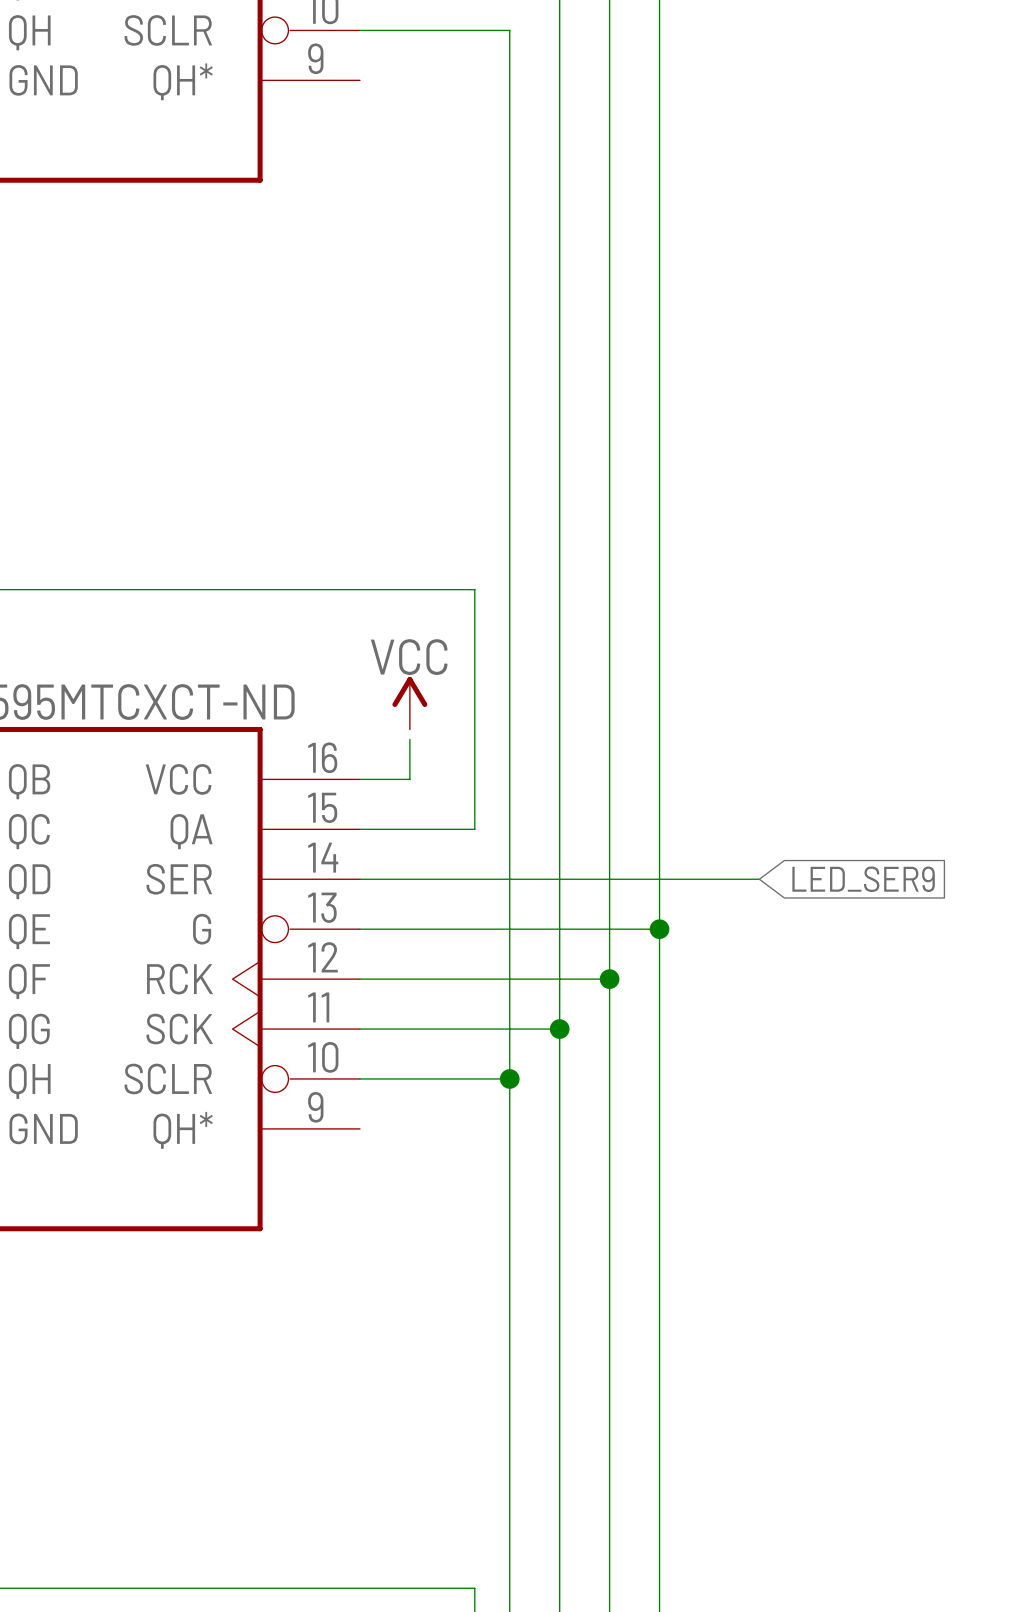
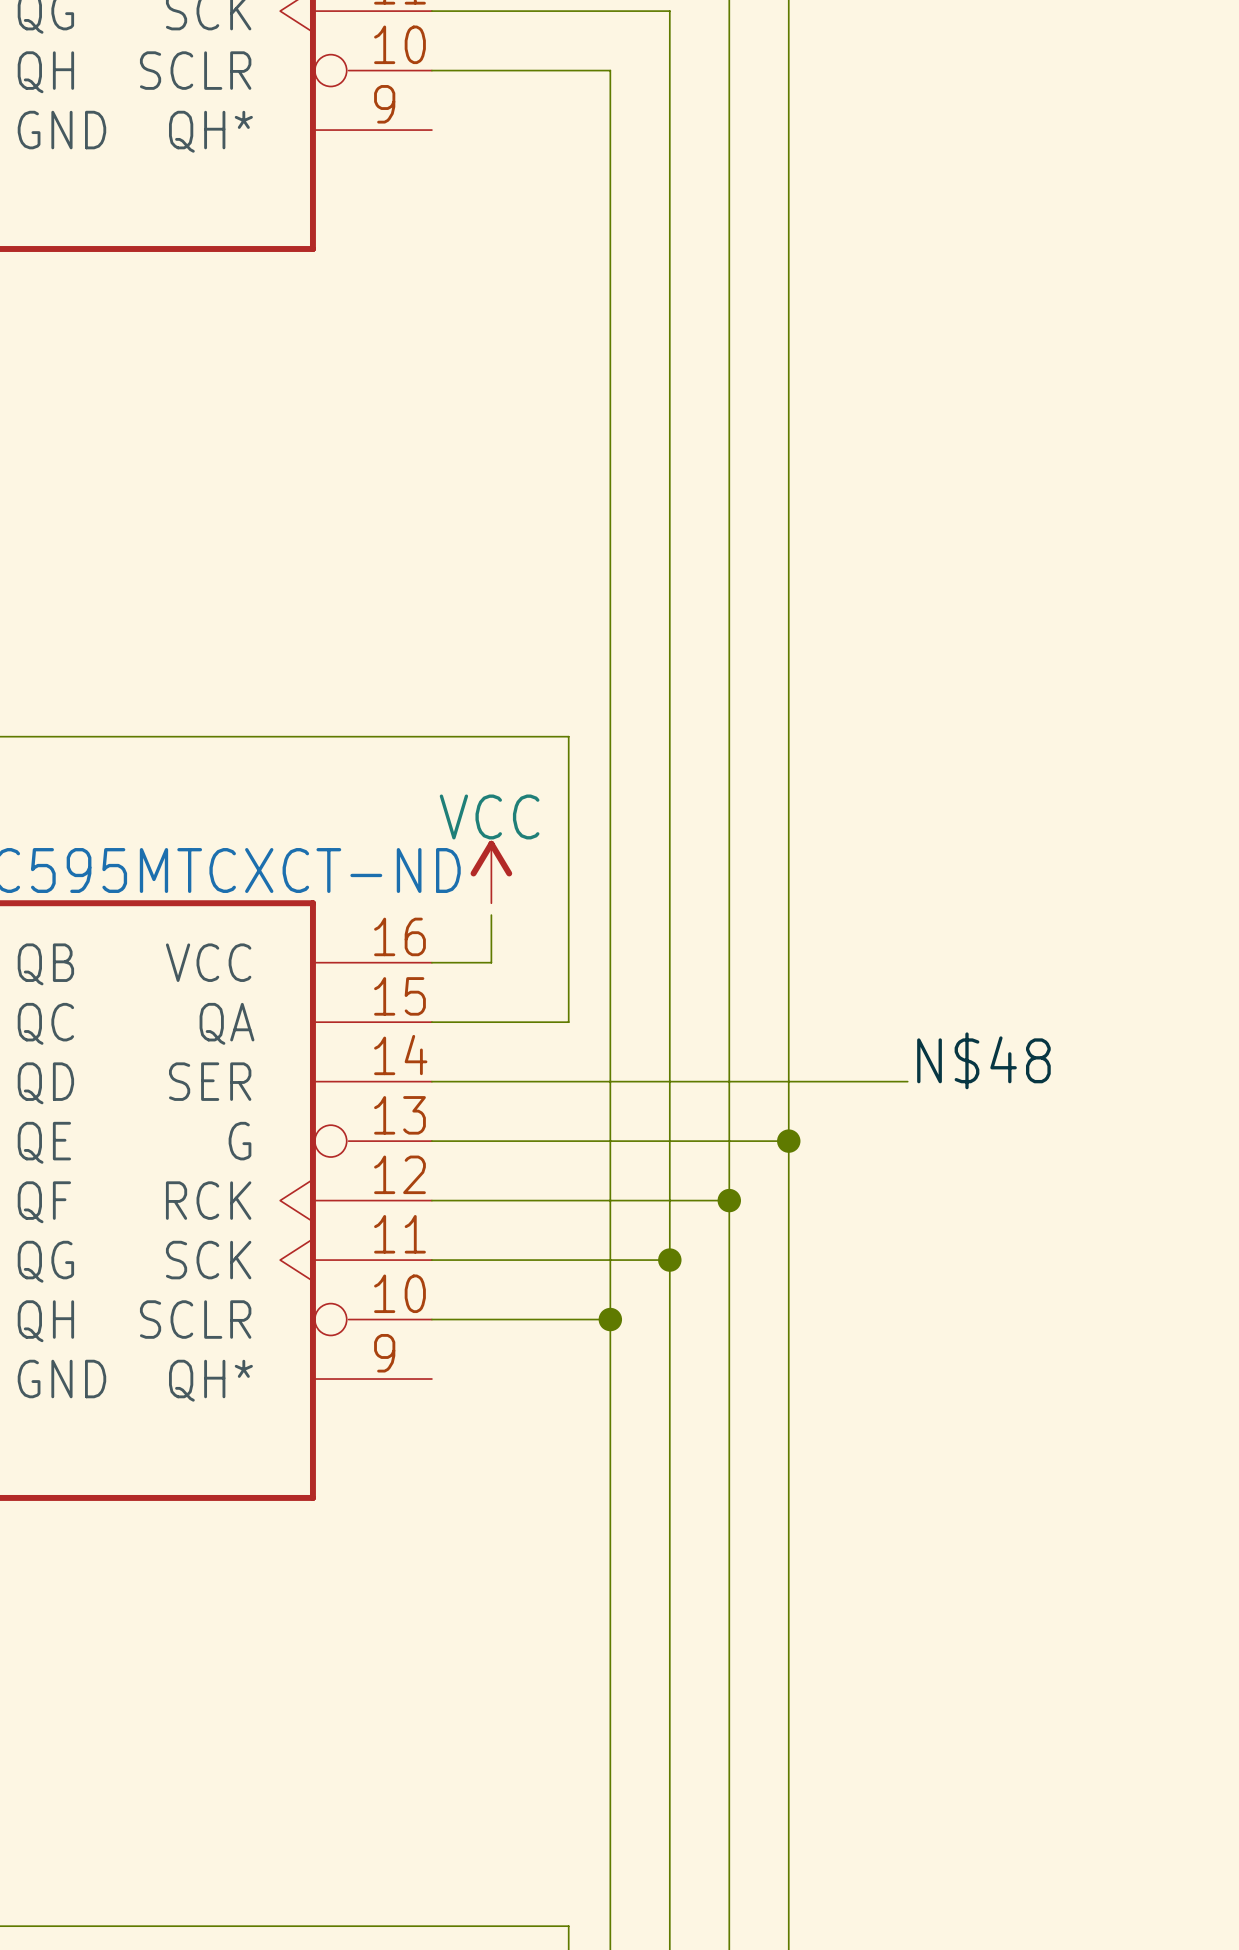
label: none -> N$48 (983, 1060)
global label: LED_SER9 (863, 879) -> none

